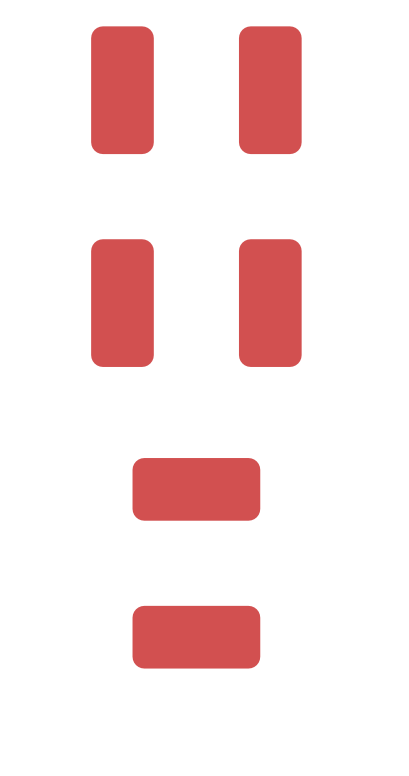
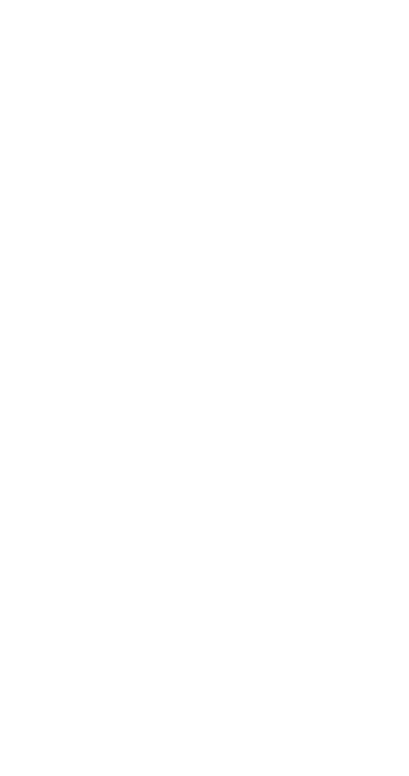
part: (196, 90) -> none
part: (196, 303) -> none
part: (196, 563) -> none

